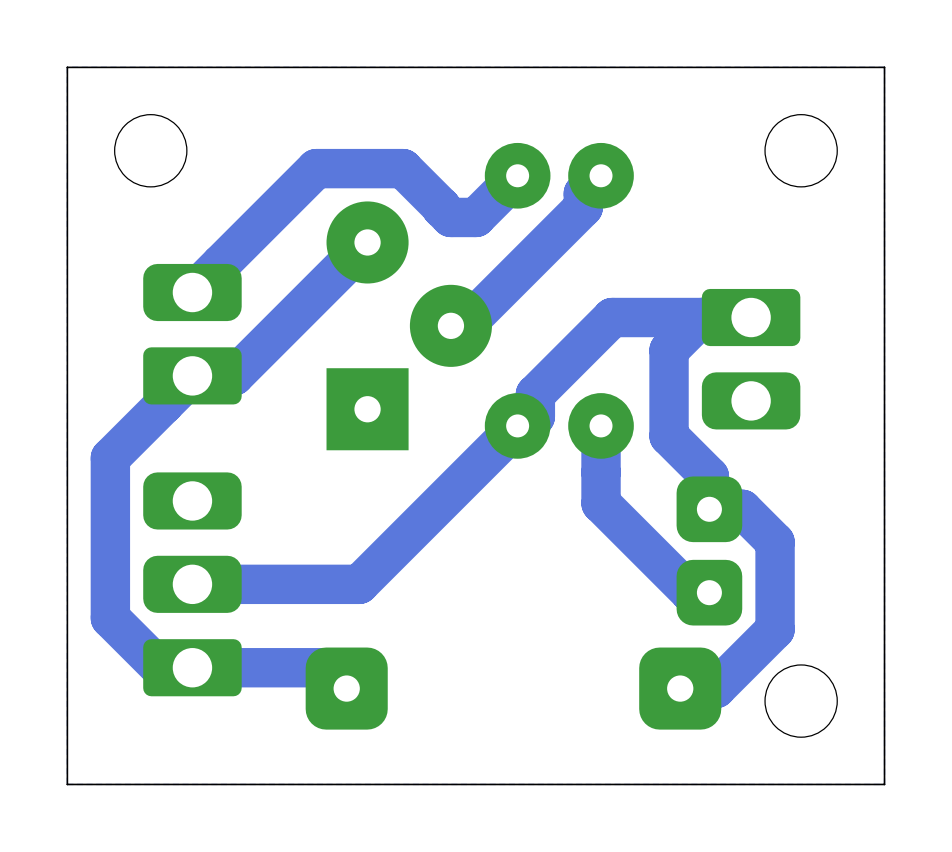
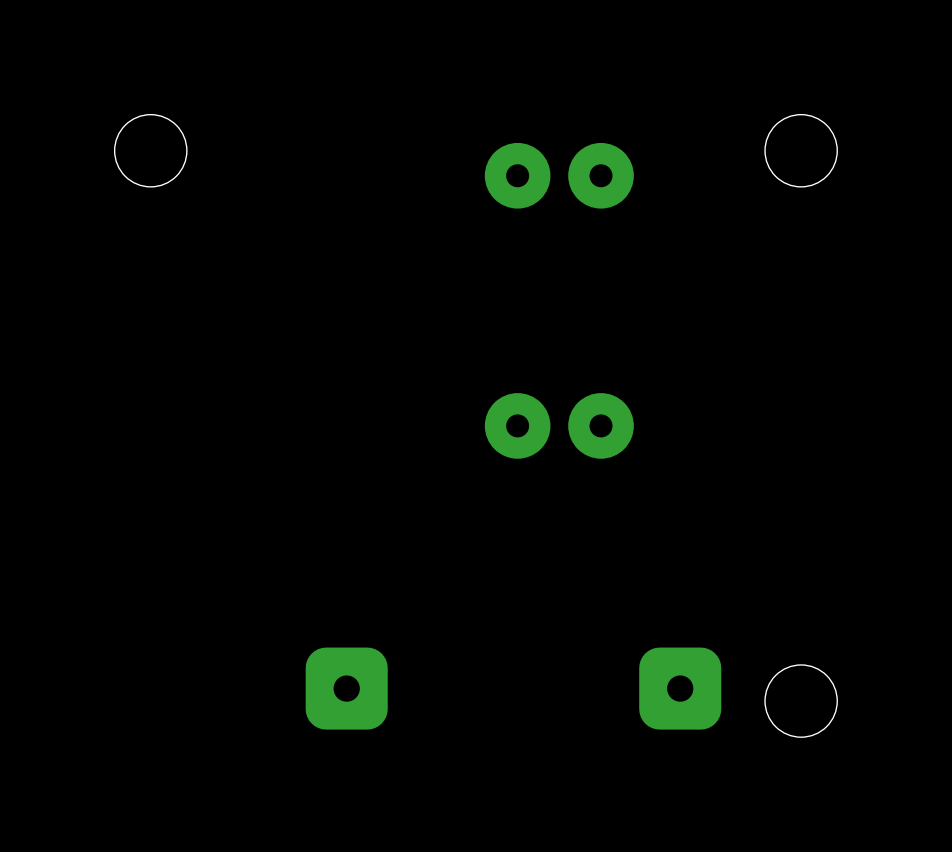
board edge: (884, 67) (884, 784) (67, 784) (67, 67) (884, 67) -> none
track: (517, 175) (475, 217) (450, 217) (403, 168) (316, 168) (192, 292) -> none
track: (601, 175) (583, 193) (583, 207) (464, 325) (450, 325) -> none
track: (367, 242) (234, 375) (192, 375) (110, 457) (110, 618) (159, 667) (325, 667) (346, 688) -> none
track: (701, 317) (669, 350) (669, 436) (709, 476) (709, 509) (742, 509) (775, 542) (775, 629) (715, 688) (680, 688) -> none
track: (751, 317) (612, 317) (535, 394) (535, 416) (525, 425) (517, 425) (359, 584) (192, 584) -> none
part: (409, 325) -> none
part: (192, 334) -> none
part: (751, 359) -> none
track: (601, 425) (601, 503) (690, 592) (709, 592) -> none
part: (709, 550) -> none
part: (192, 584) -> none

